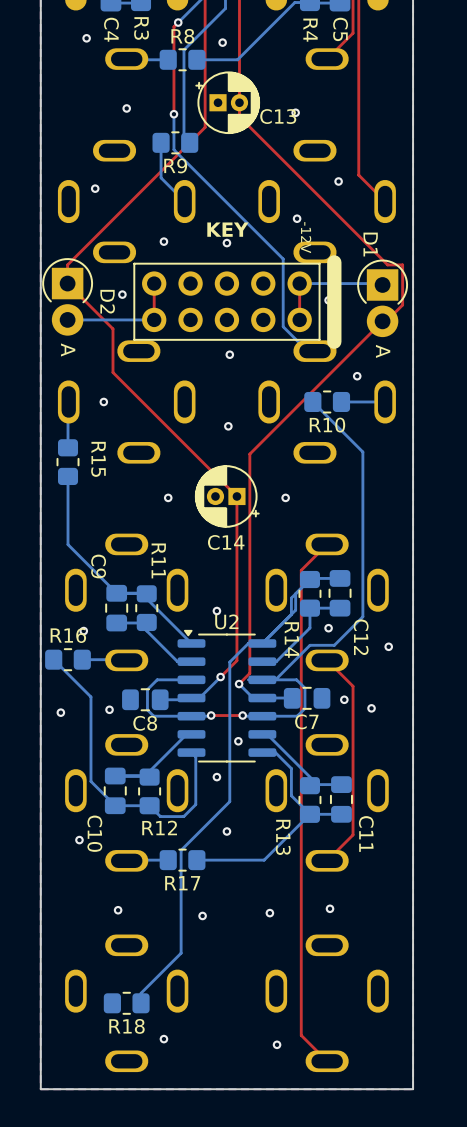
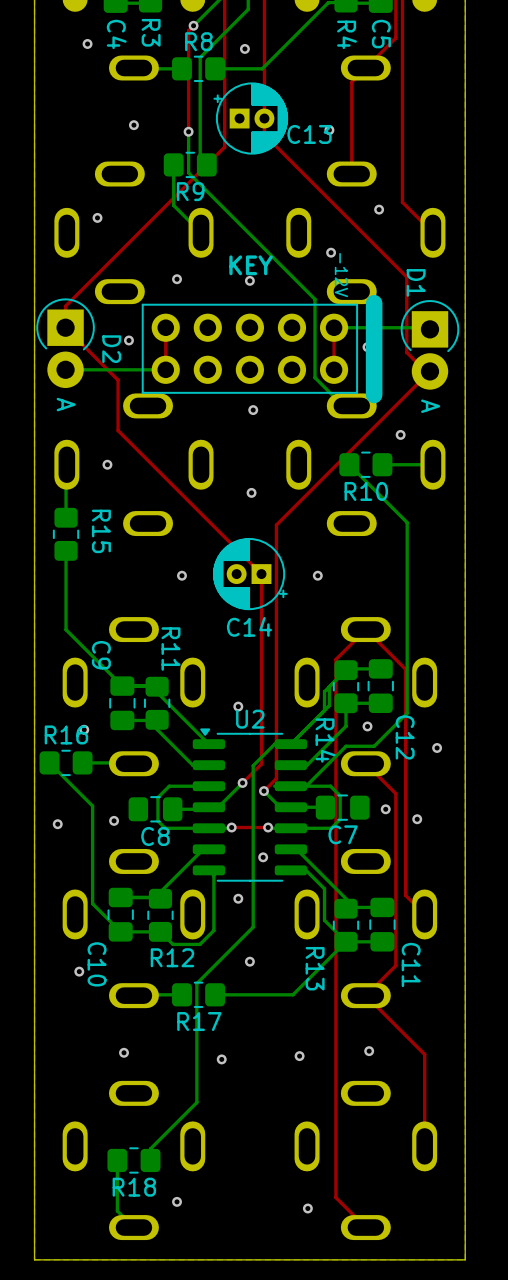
top track: none -> (365, 68) (351, 82) (351, 174)
top track: (362, 239) (387, 264) (402, 264) (402, 305) (386, 321) (382, 321) -> (406, 277) (406, 352) (425, 371) (429, 371)
top track: none -> (365, 629) (405, 669) (405, 895) (424, 914)
top track: none -> (365, 995) (424, 1054) (424, 1146)
bottom track: none -> (117, 1160) (117, 1210) (133, 1227)

